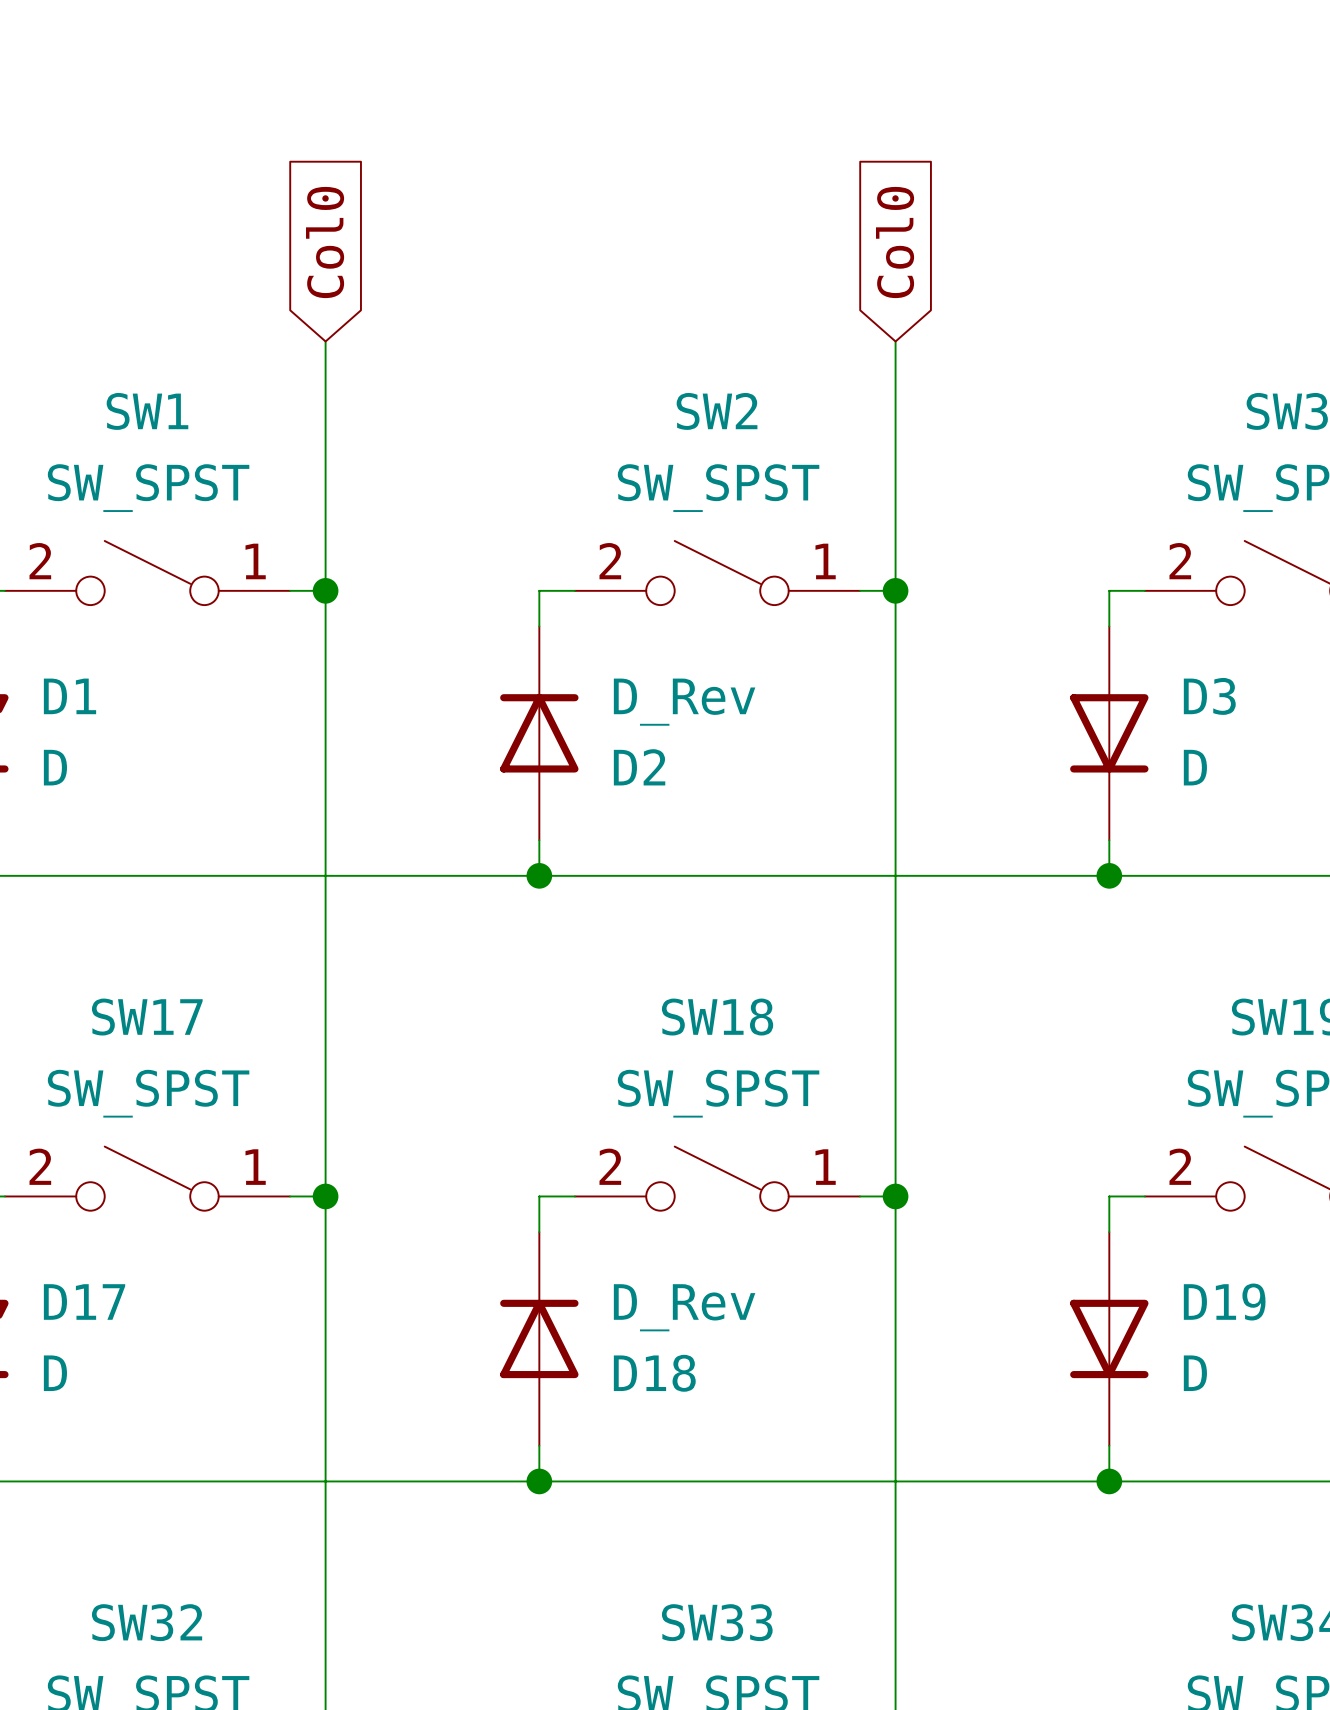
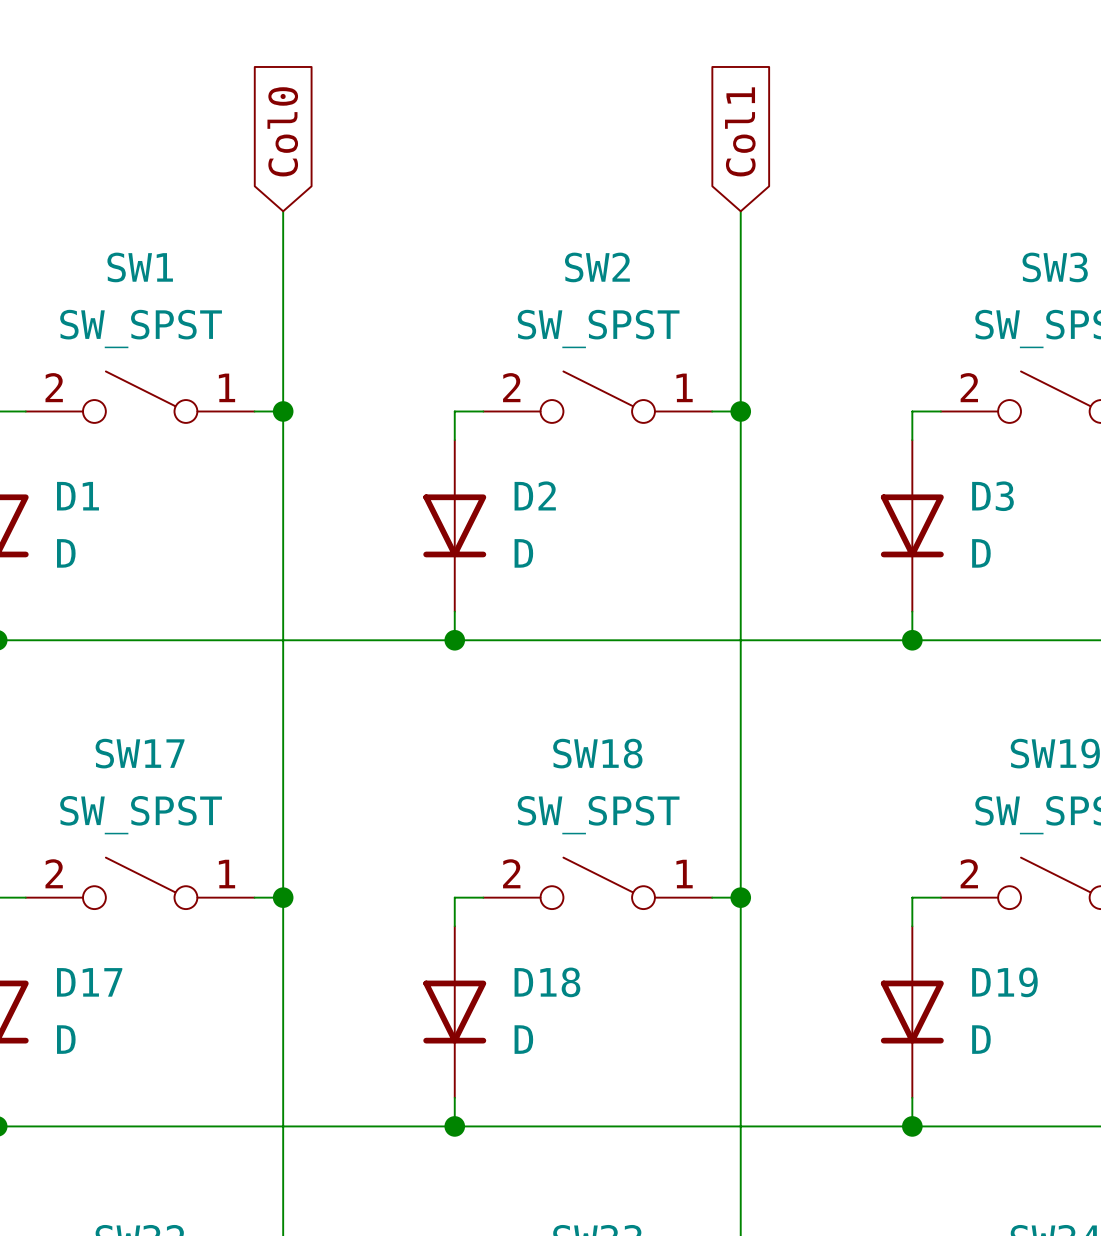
global label: Col0 (895, 242) -> Col1 (740, 131)
D2 value: D_Rev (684, 702) -> D (523, 553)
D2 rotation: 0° (539, 733) -> 180° (454, 525)
D2 name position: D2 (639, 767) -> D2 (535, 495)
D18 value: D_Rev (684, 1307) -> D (523, 1039)
D18 rotation: 0° (539, 1338) -> 180° (454, 1012)
D18 name position: D18 (654, 1373) -> D18 (547, 982)

